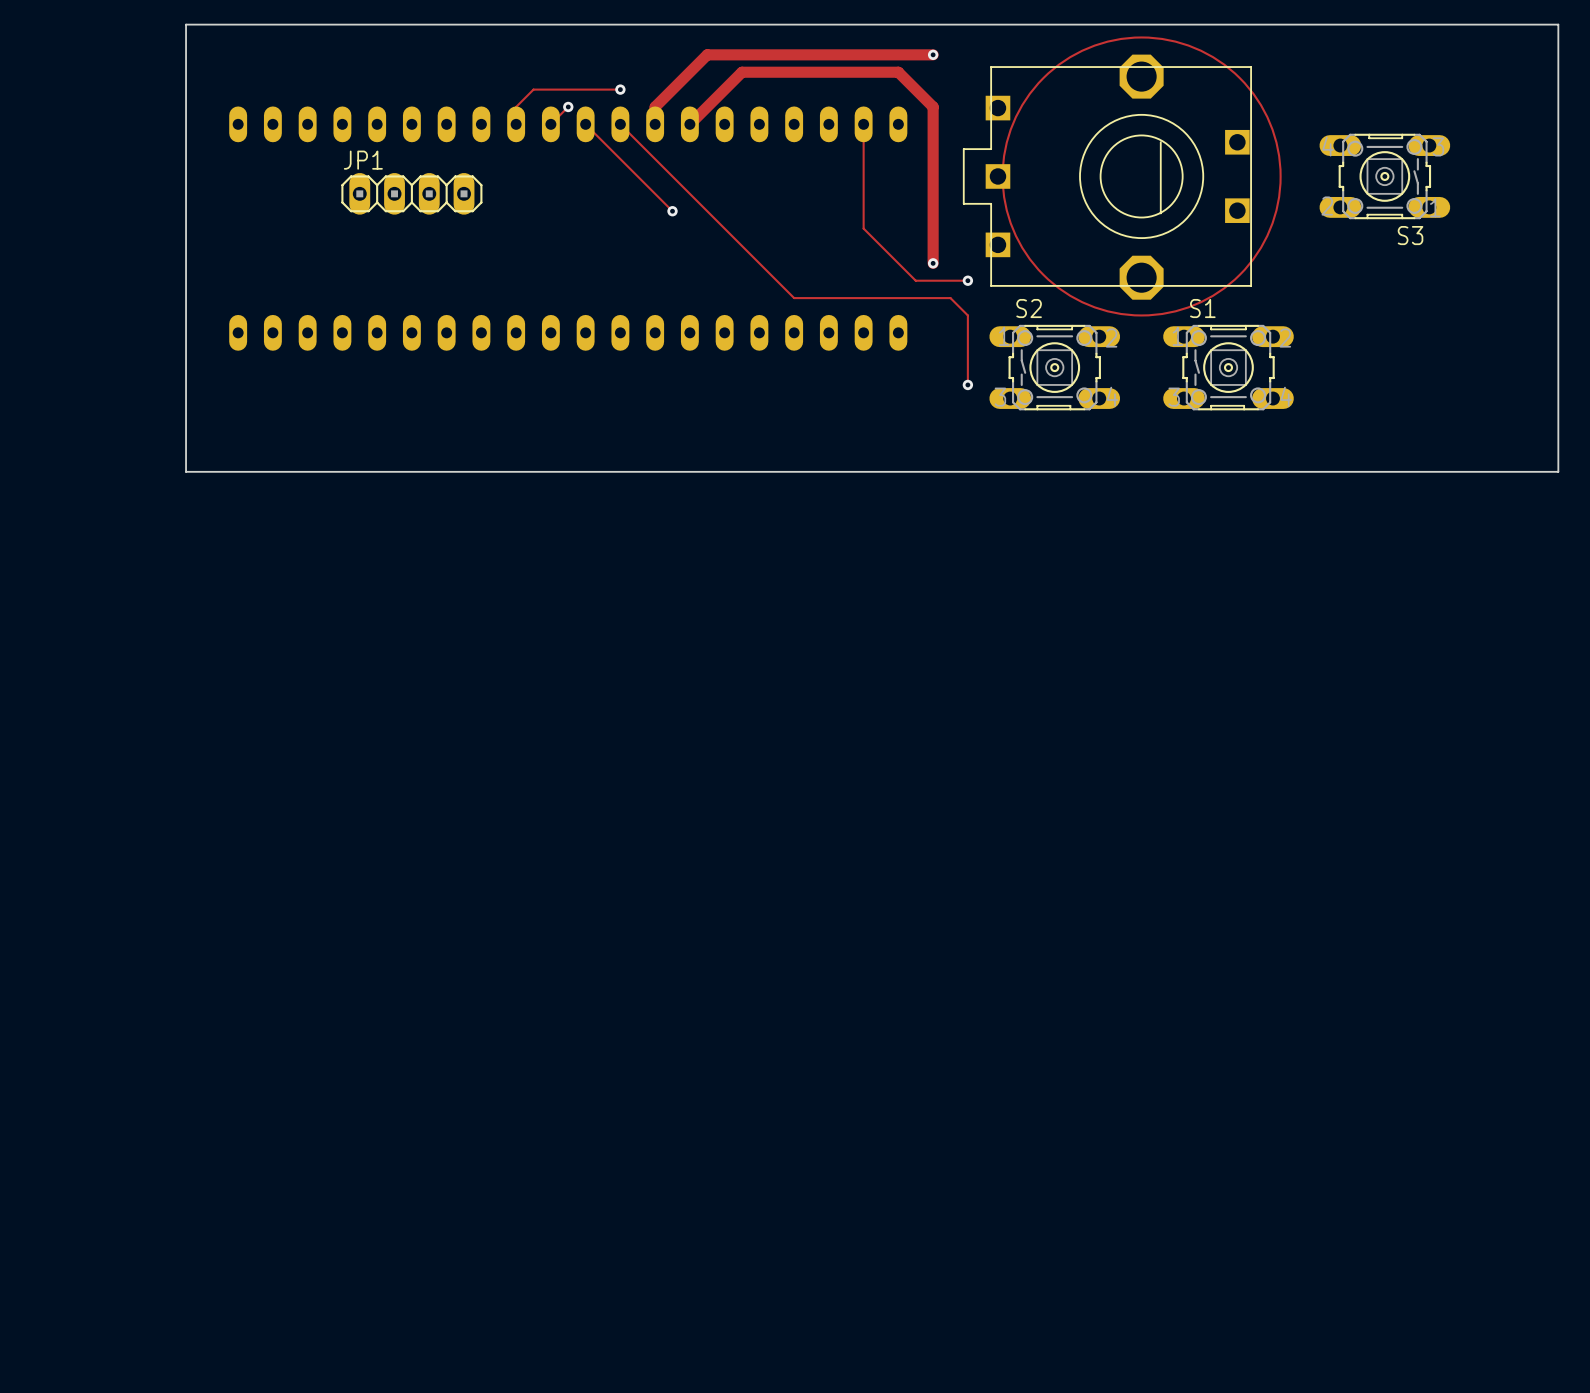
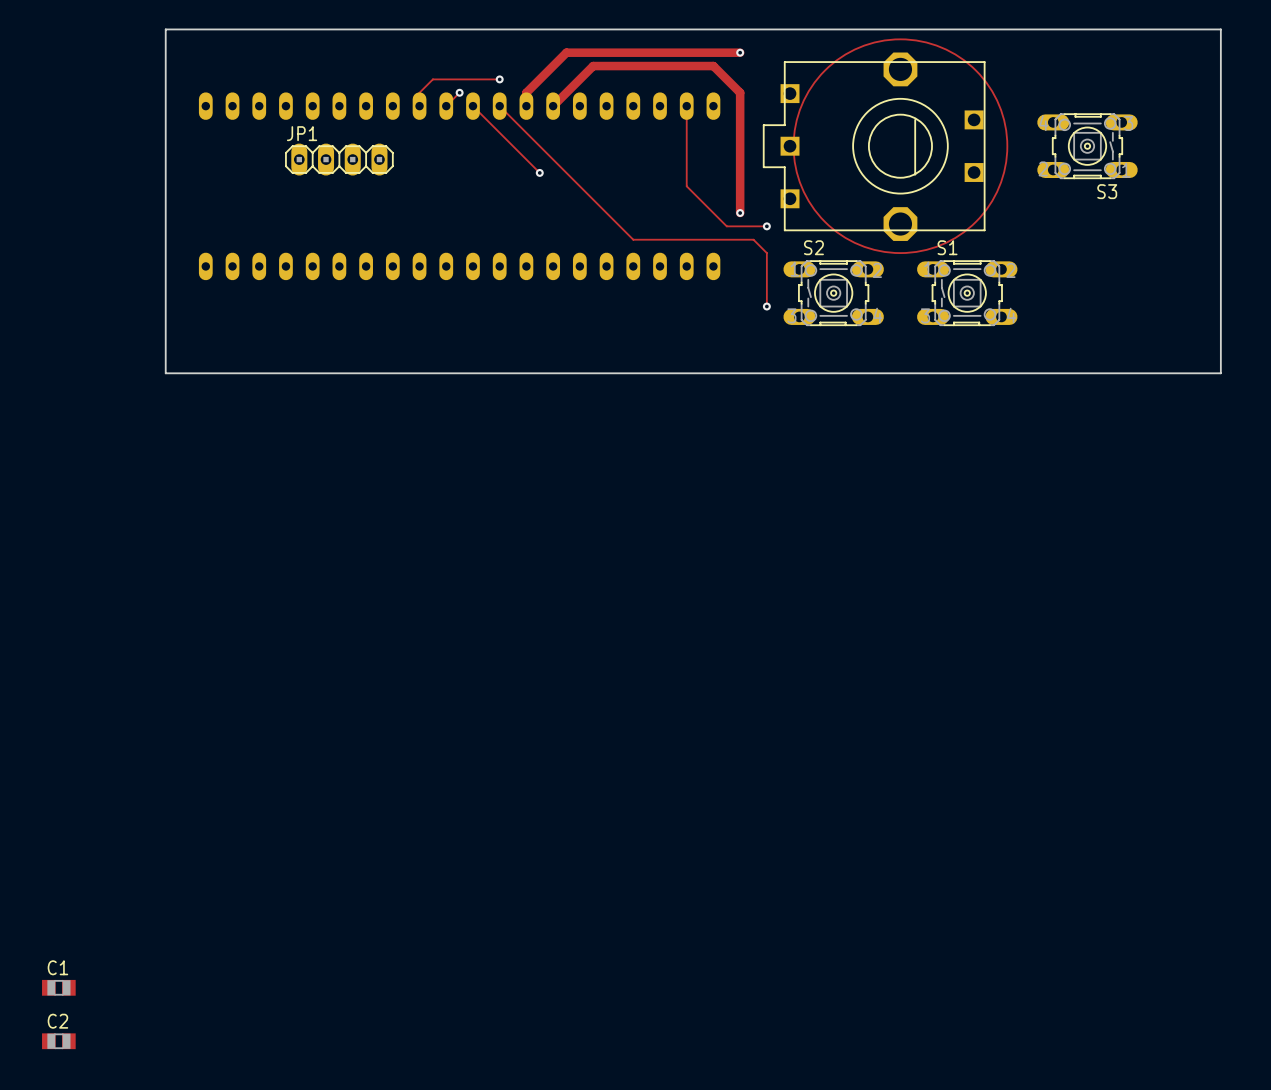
C1: none -> (58, 987)
C2: none -> (58, 1041)

